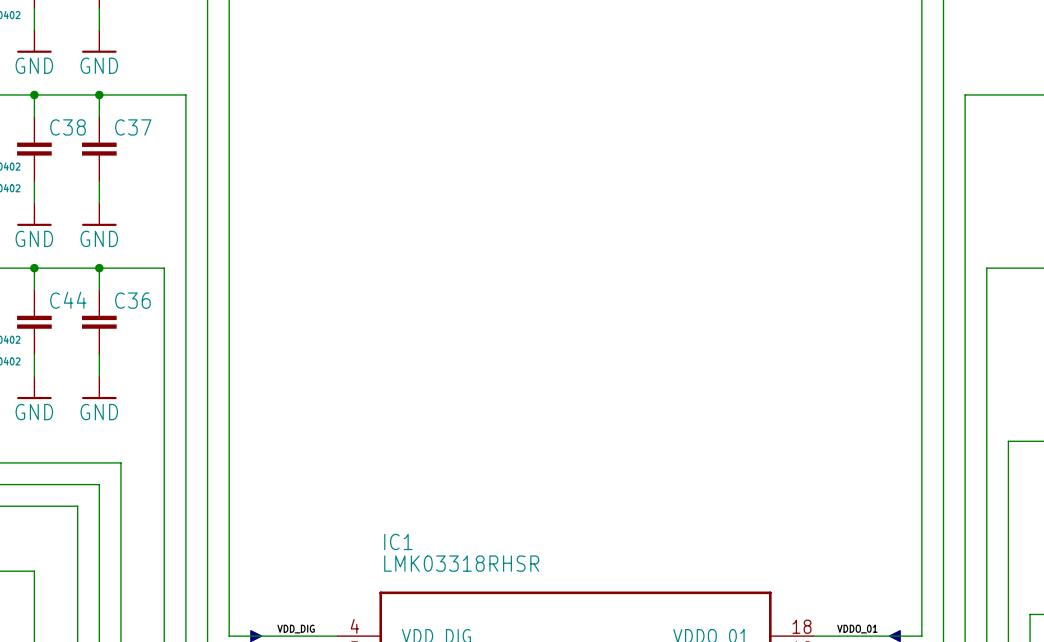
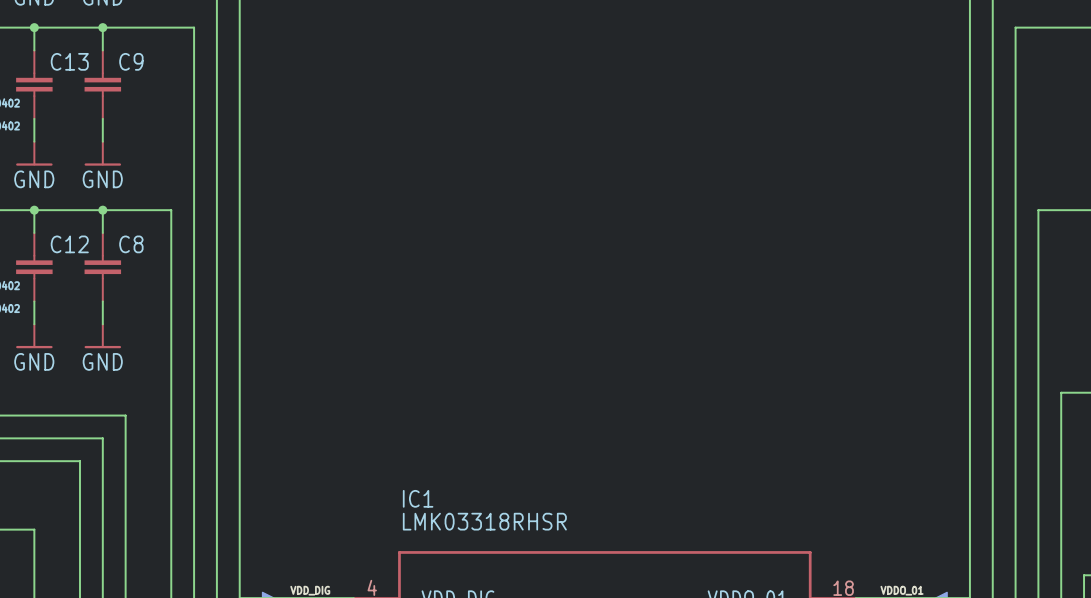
C38 name: C38 (67, 127) -> C13 (69, 61)
C37 name: C37 (133, 127) -> C9 (131, 61)
C44 name: C44 (68, 300) -> C12 (69, 244)
C36 name: C36 (132, 300) -> C8 (131, 244)

